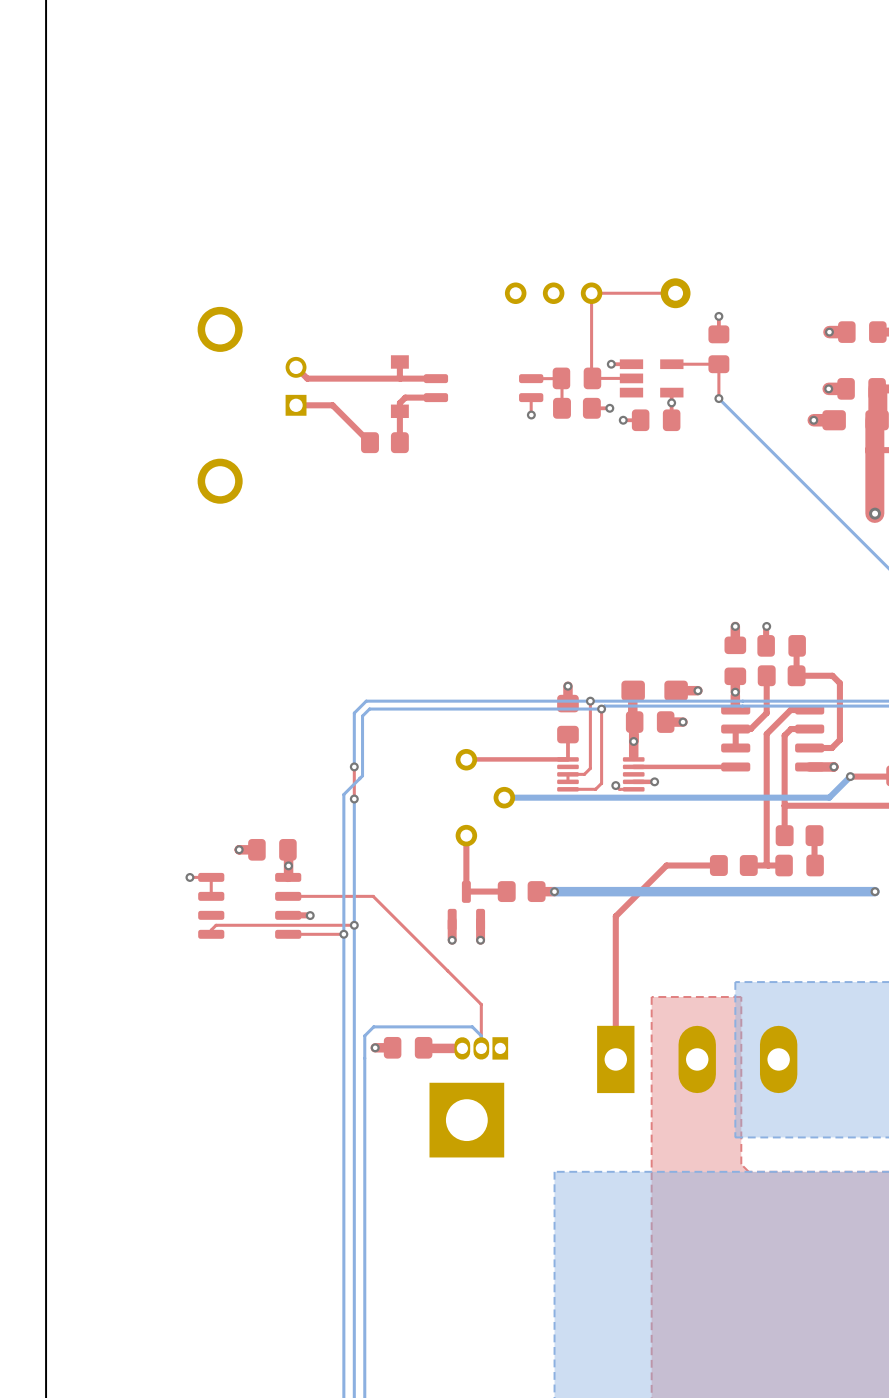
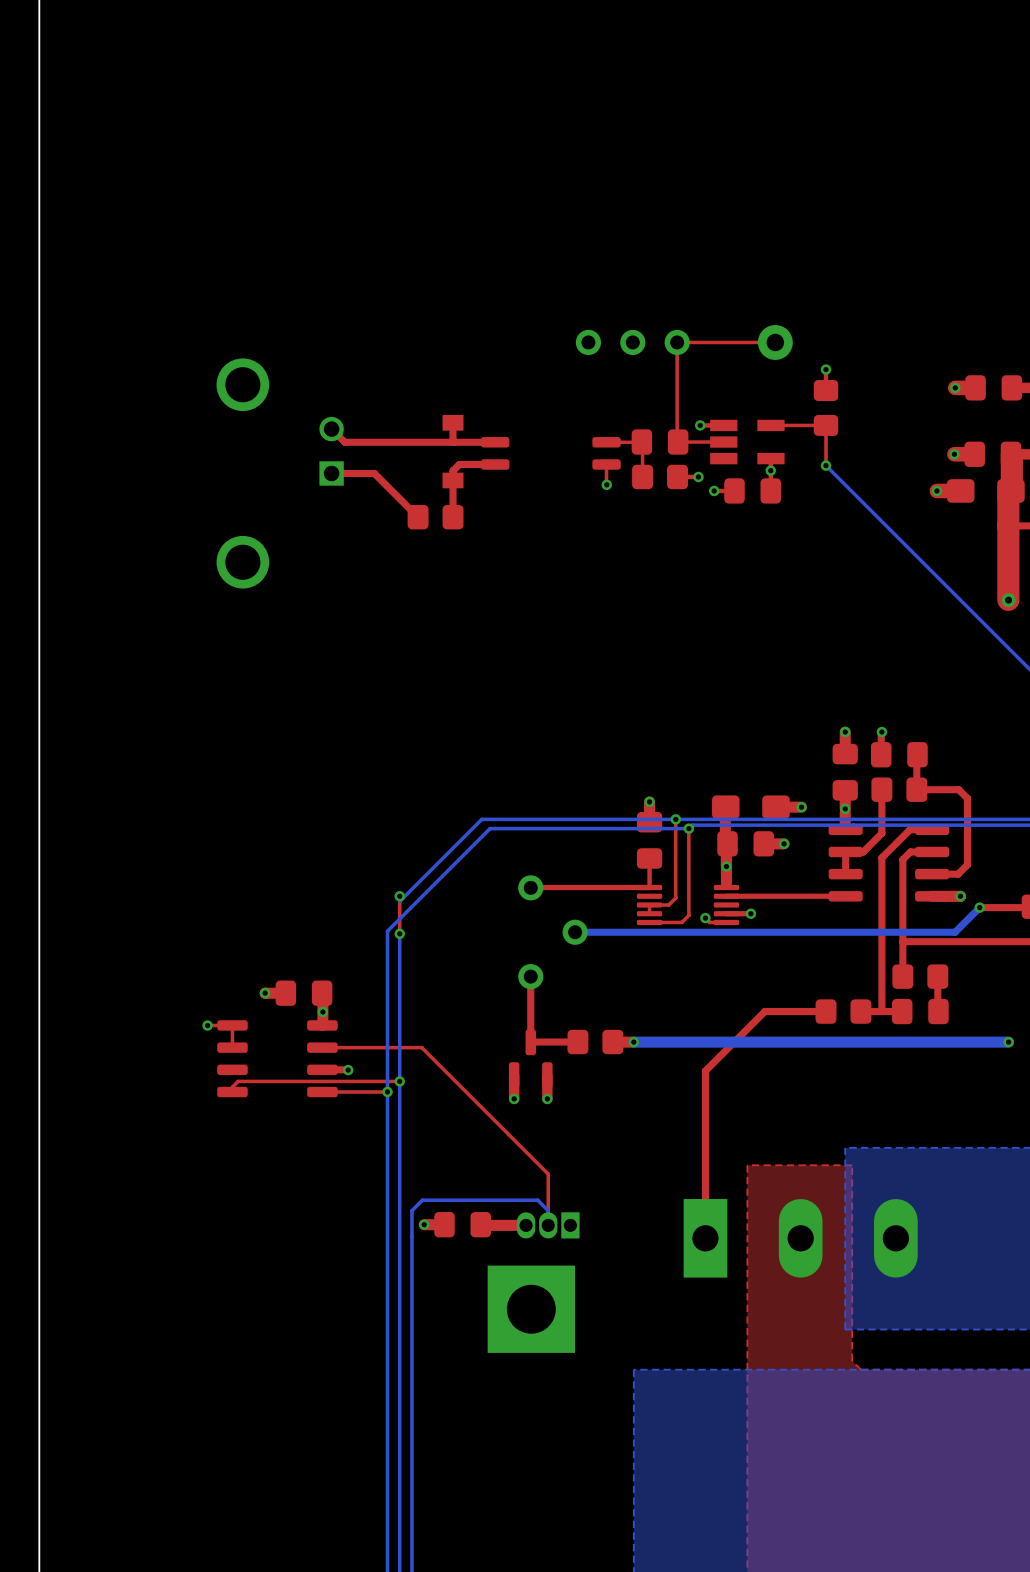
bottom track: (424, 701) (366, 701) (354, 713) (354, 766) -> (481, 819) (399, 901)
bottom track: (431, 709) (369, 709) (362, 716) (362, 775) (343, 796) -> (490, 828) (387, 931)

